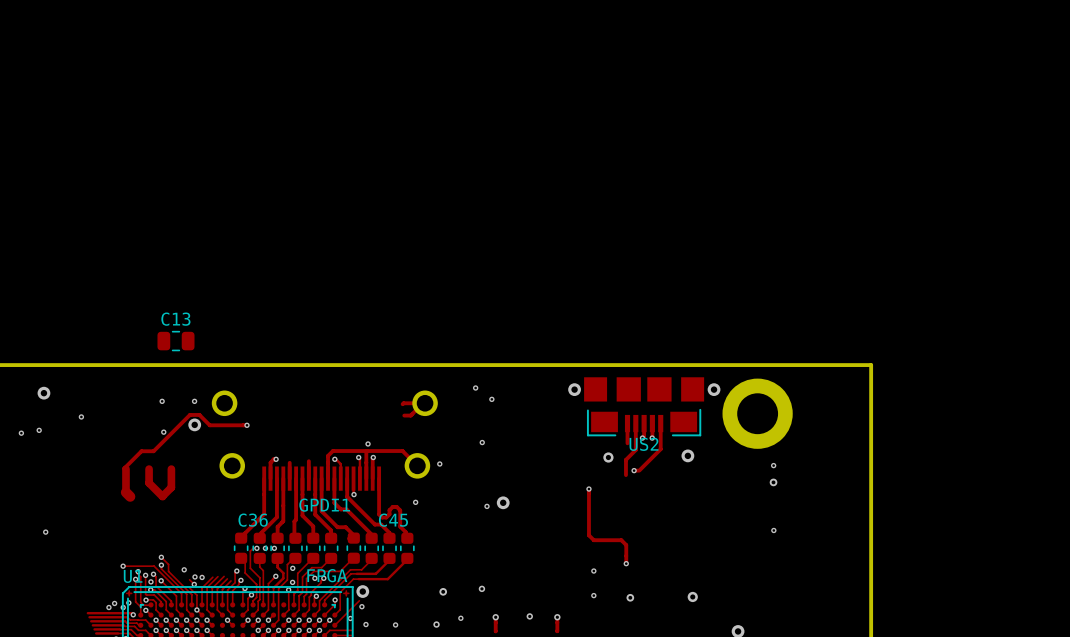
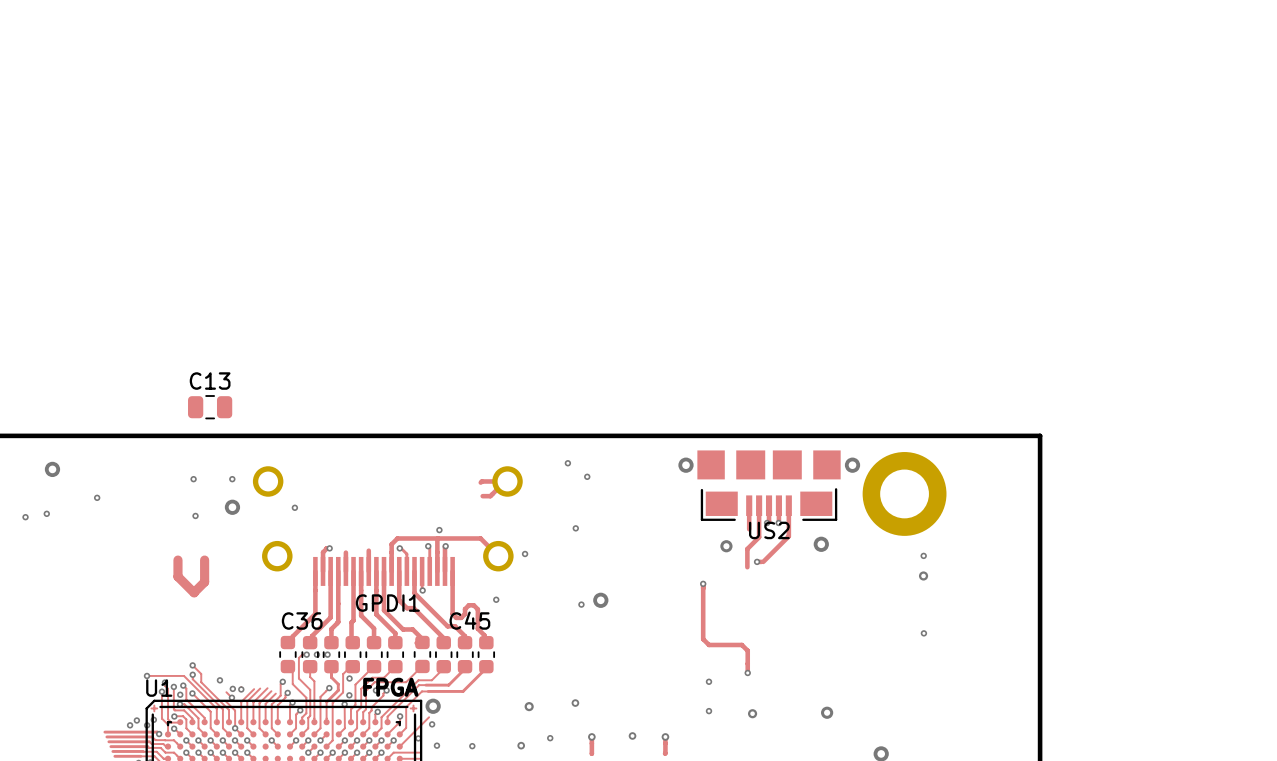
track: (246, 425) (209, 425) (199, 414) (189, 414) (153, 451) (141, 451) (124, 469) -> none
track: (125, 469) (125, 492) (130, 496) -> none
via: (45, 532) -> none

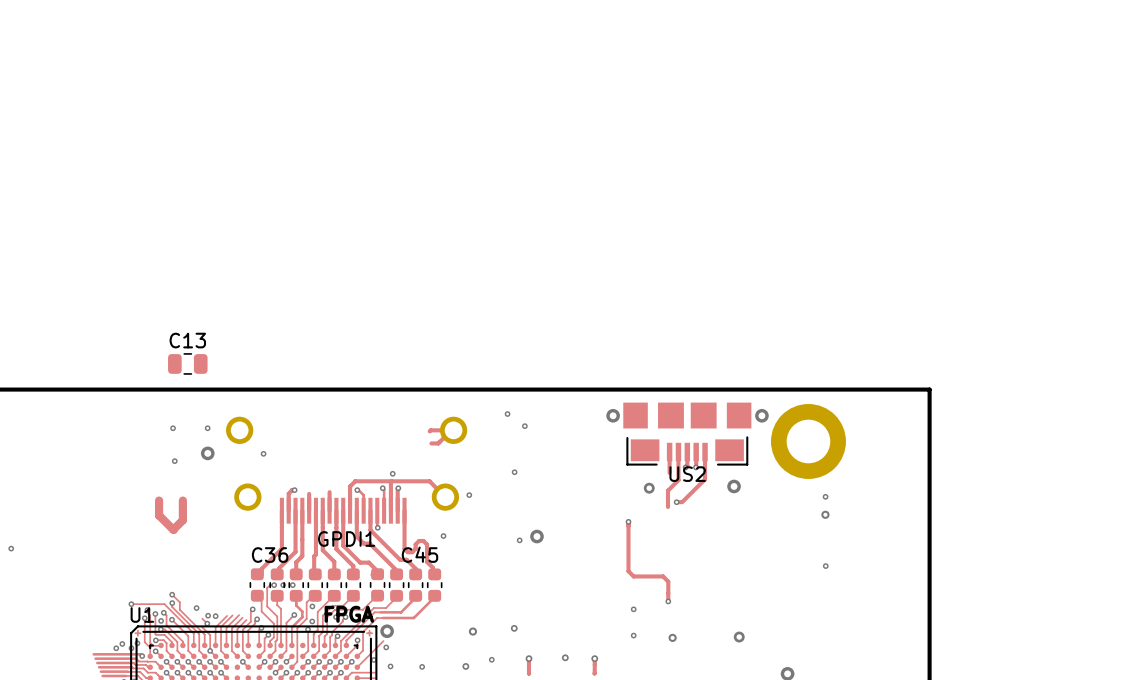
via: (52, 469) -> none
via: (97, 497) -> none
via: (46, 513) -> none
via: (25, 517) -> none
via: none -> (11, 548)

